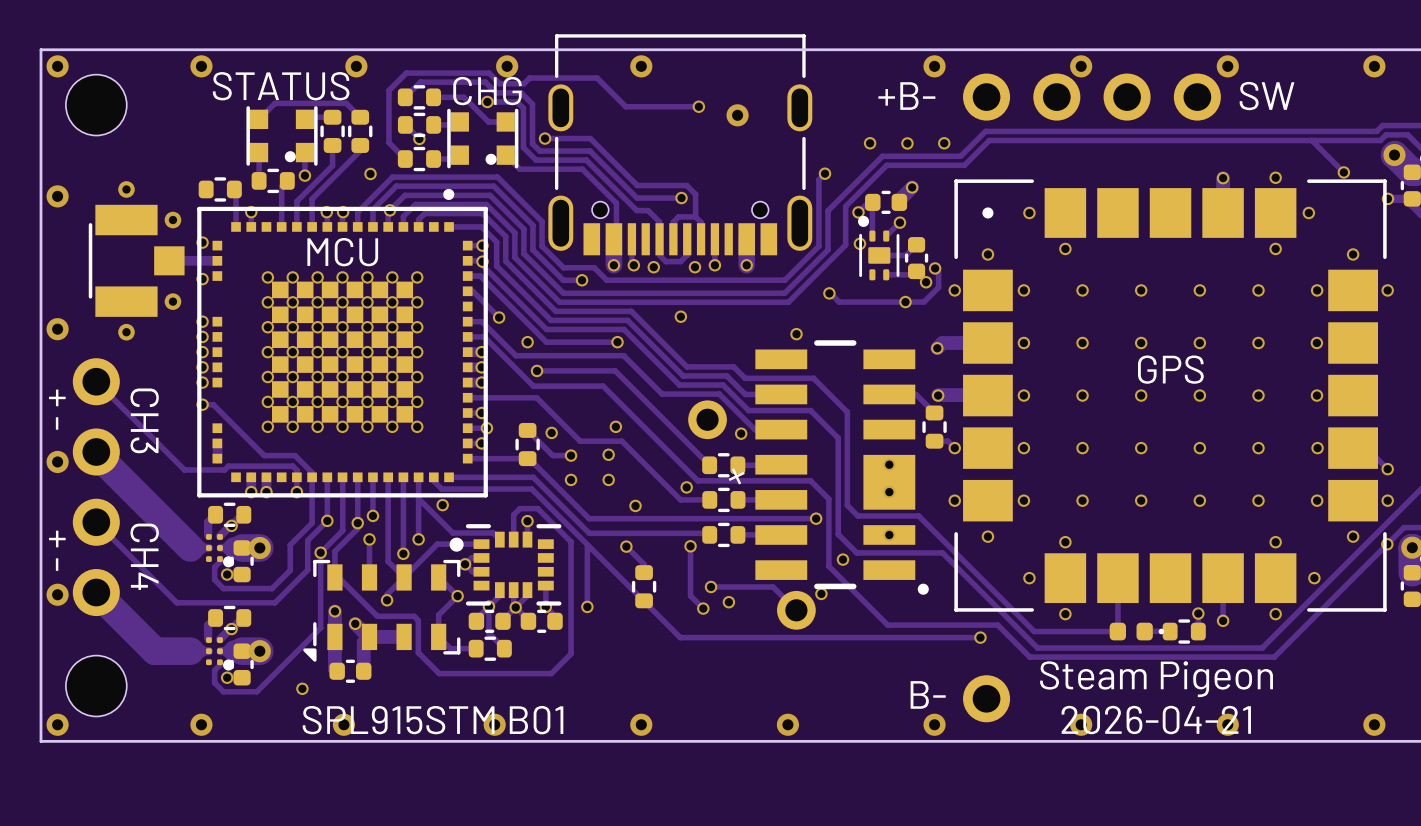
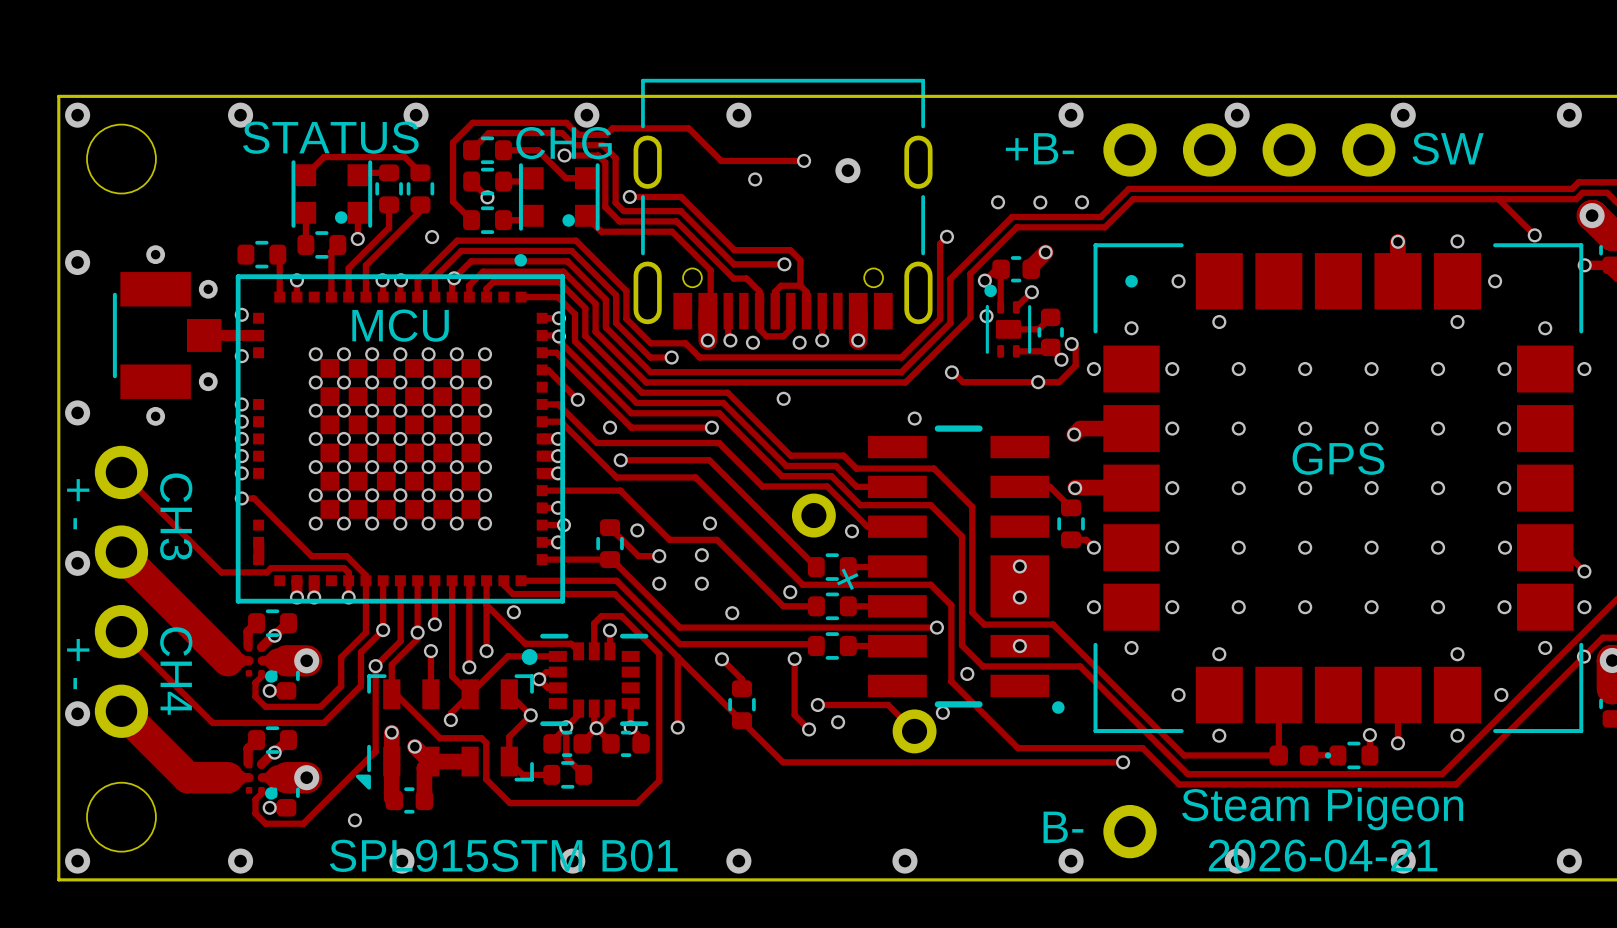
via: none -> (755, 179)

